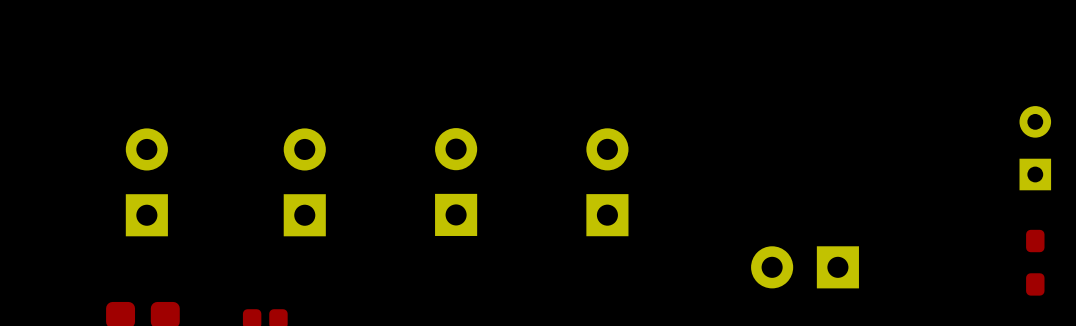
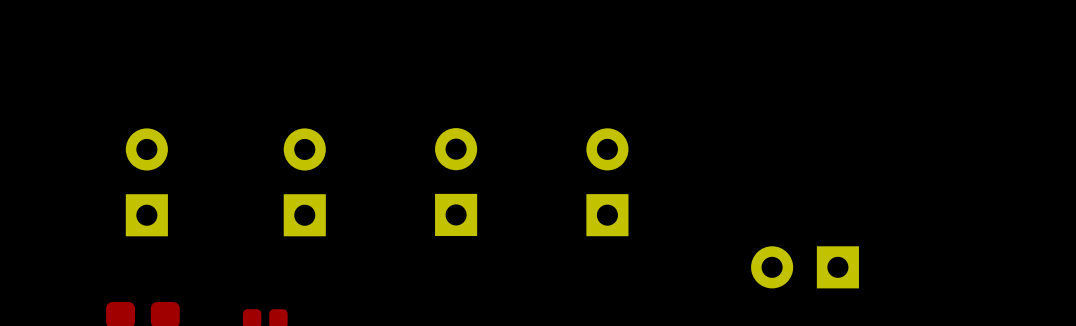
part: (1035, 148) -> none
part: (1035, 262) -> none

